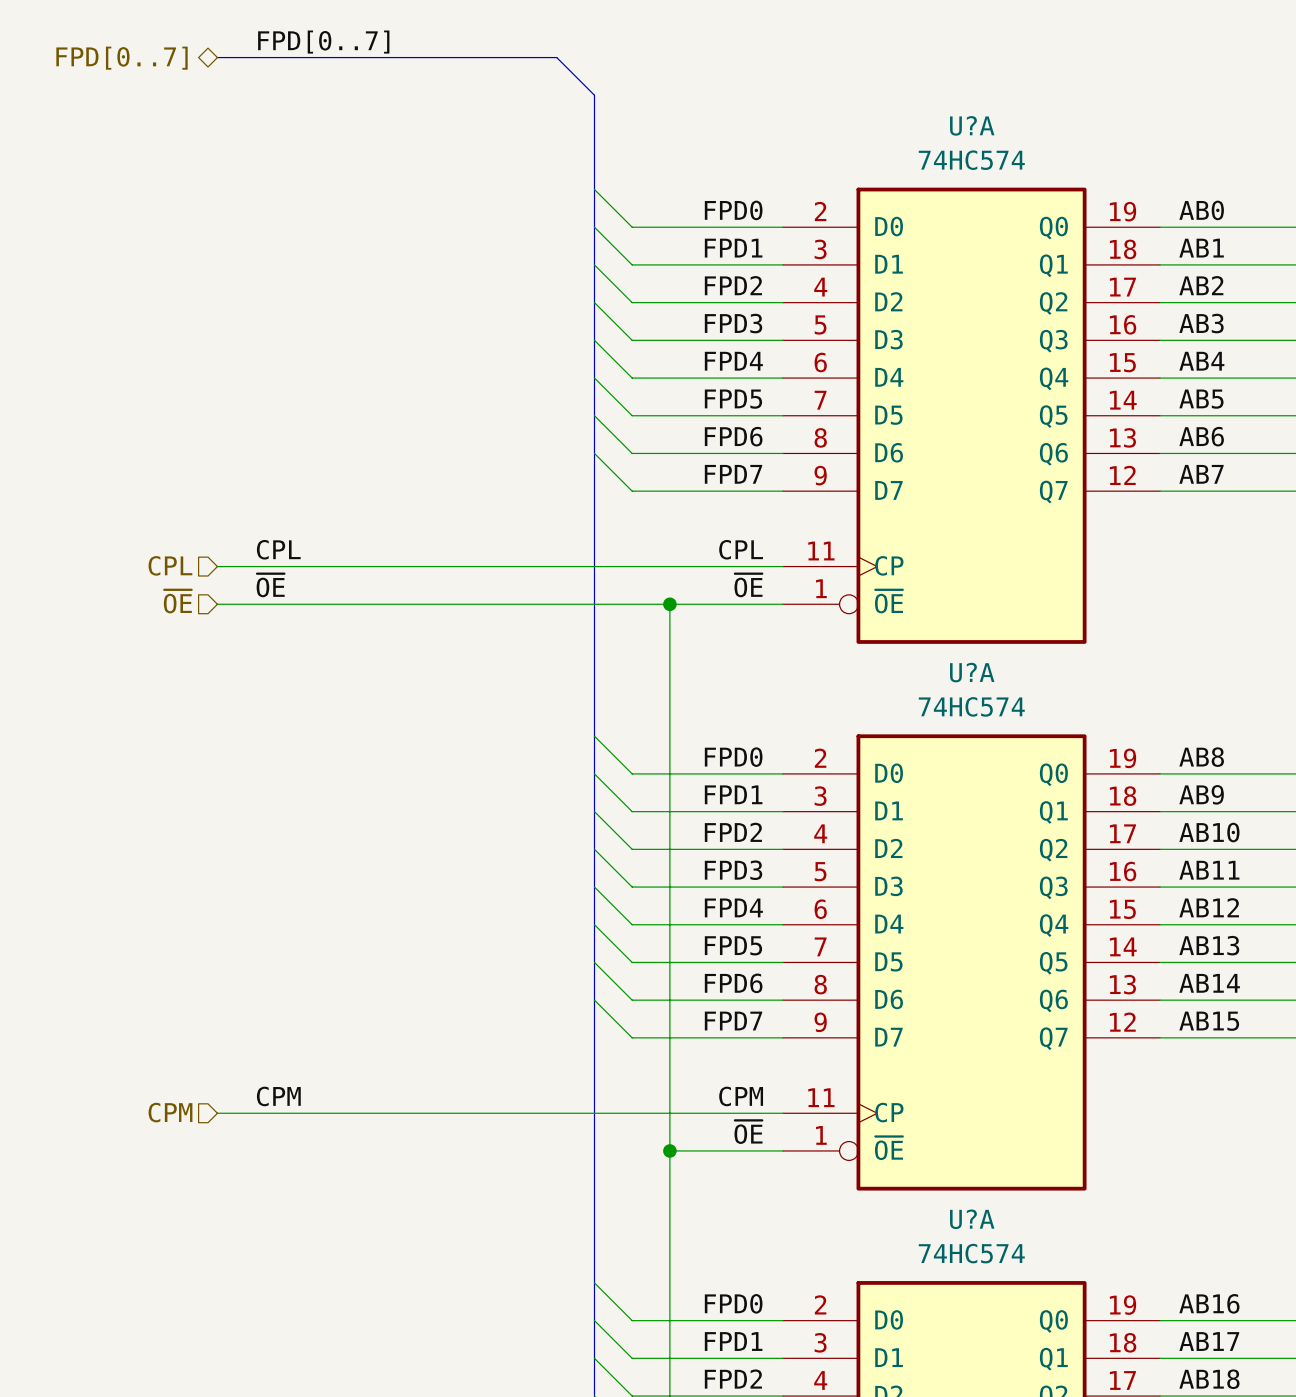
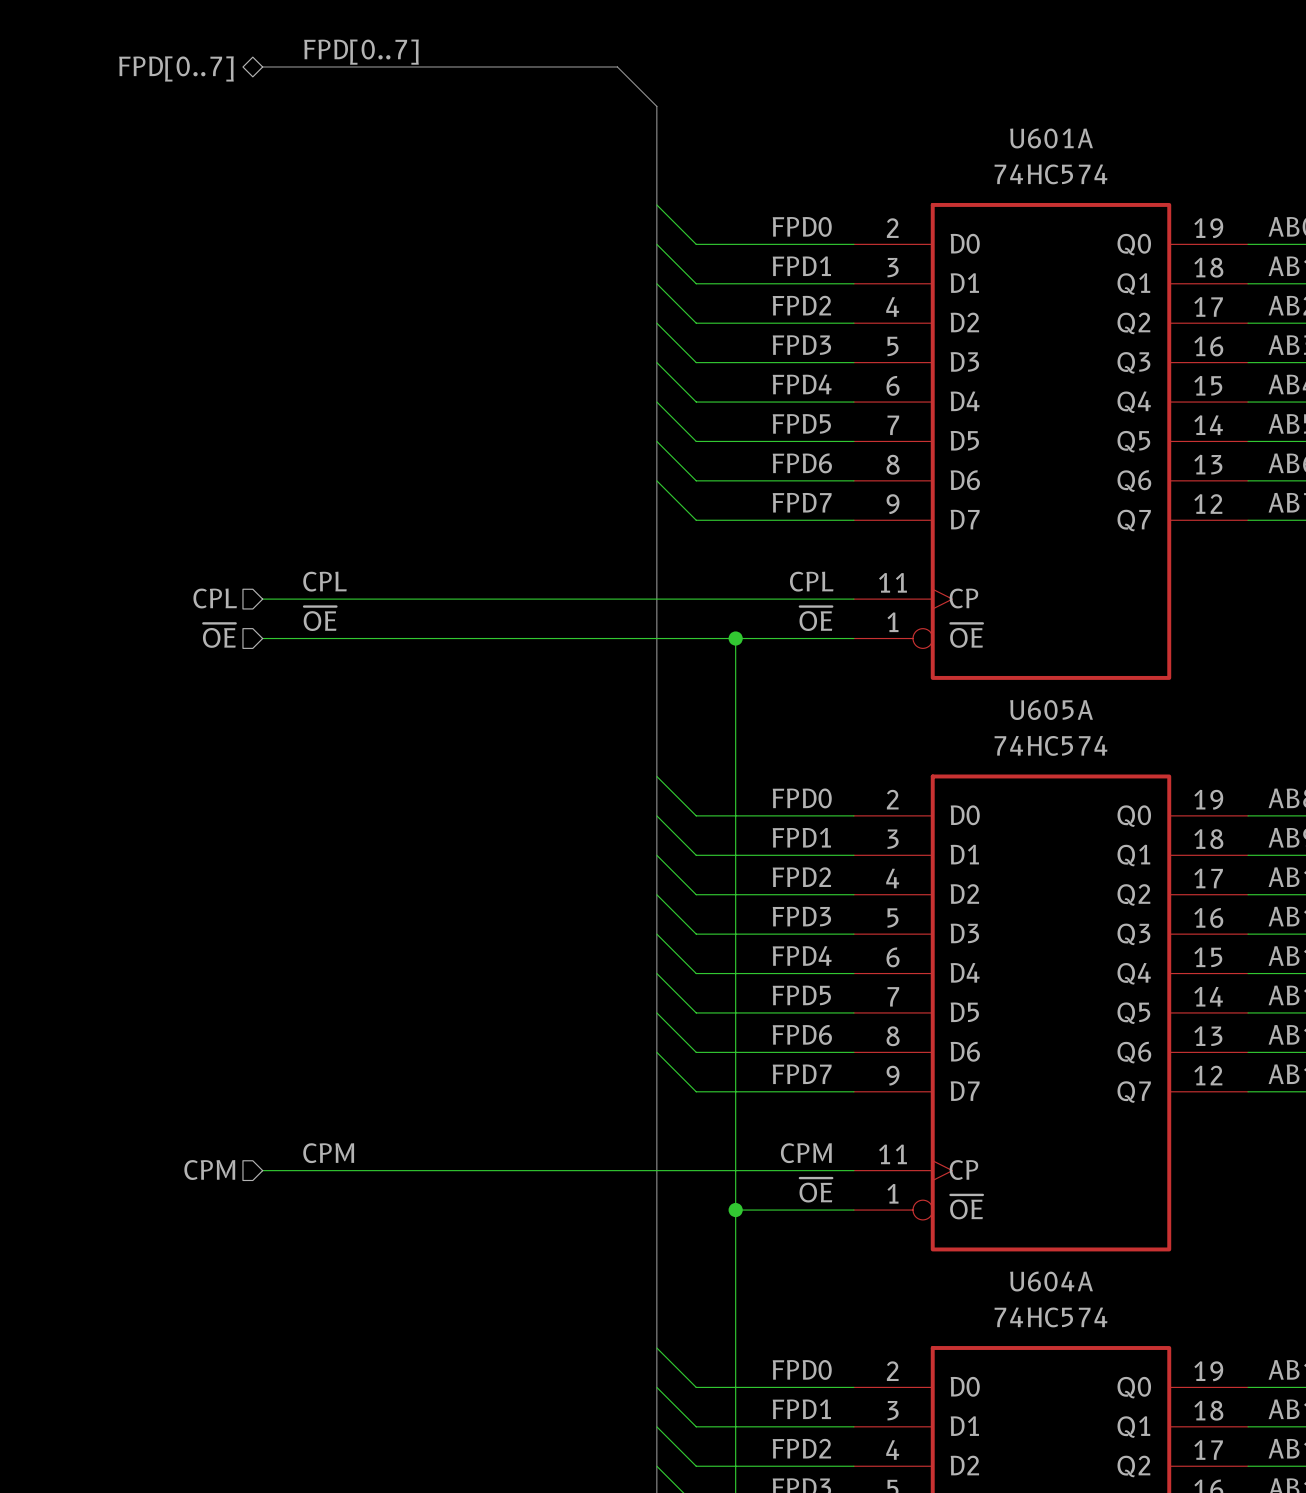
U?A name: U?A (972, 125) -> U601A (1051, 138)
U?A name: U?A (972, 672) -> U605A (1051, 710)
U?A name: U?A (972, 1219) -> U604A (1051, 1281)

